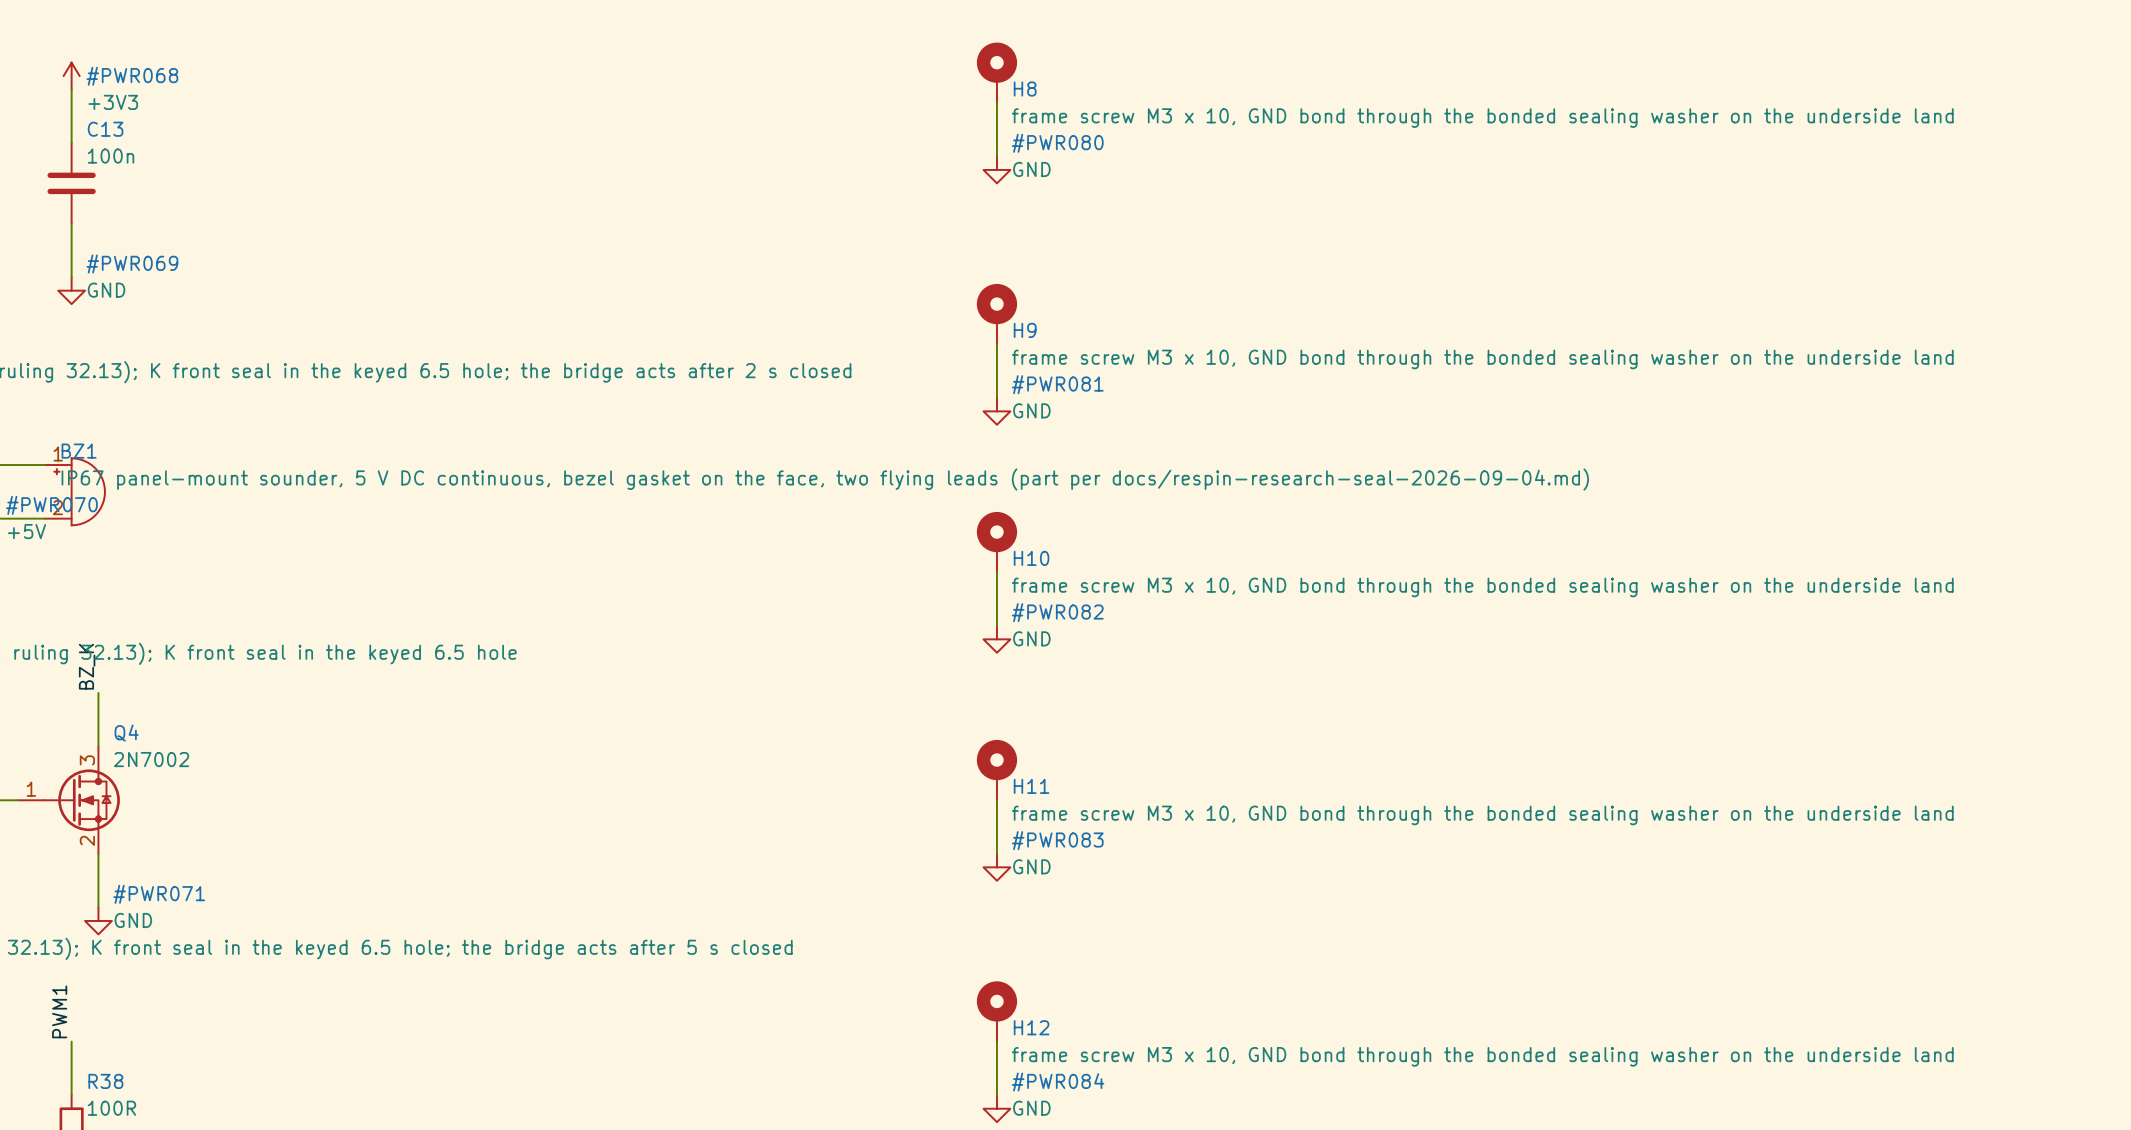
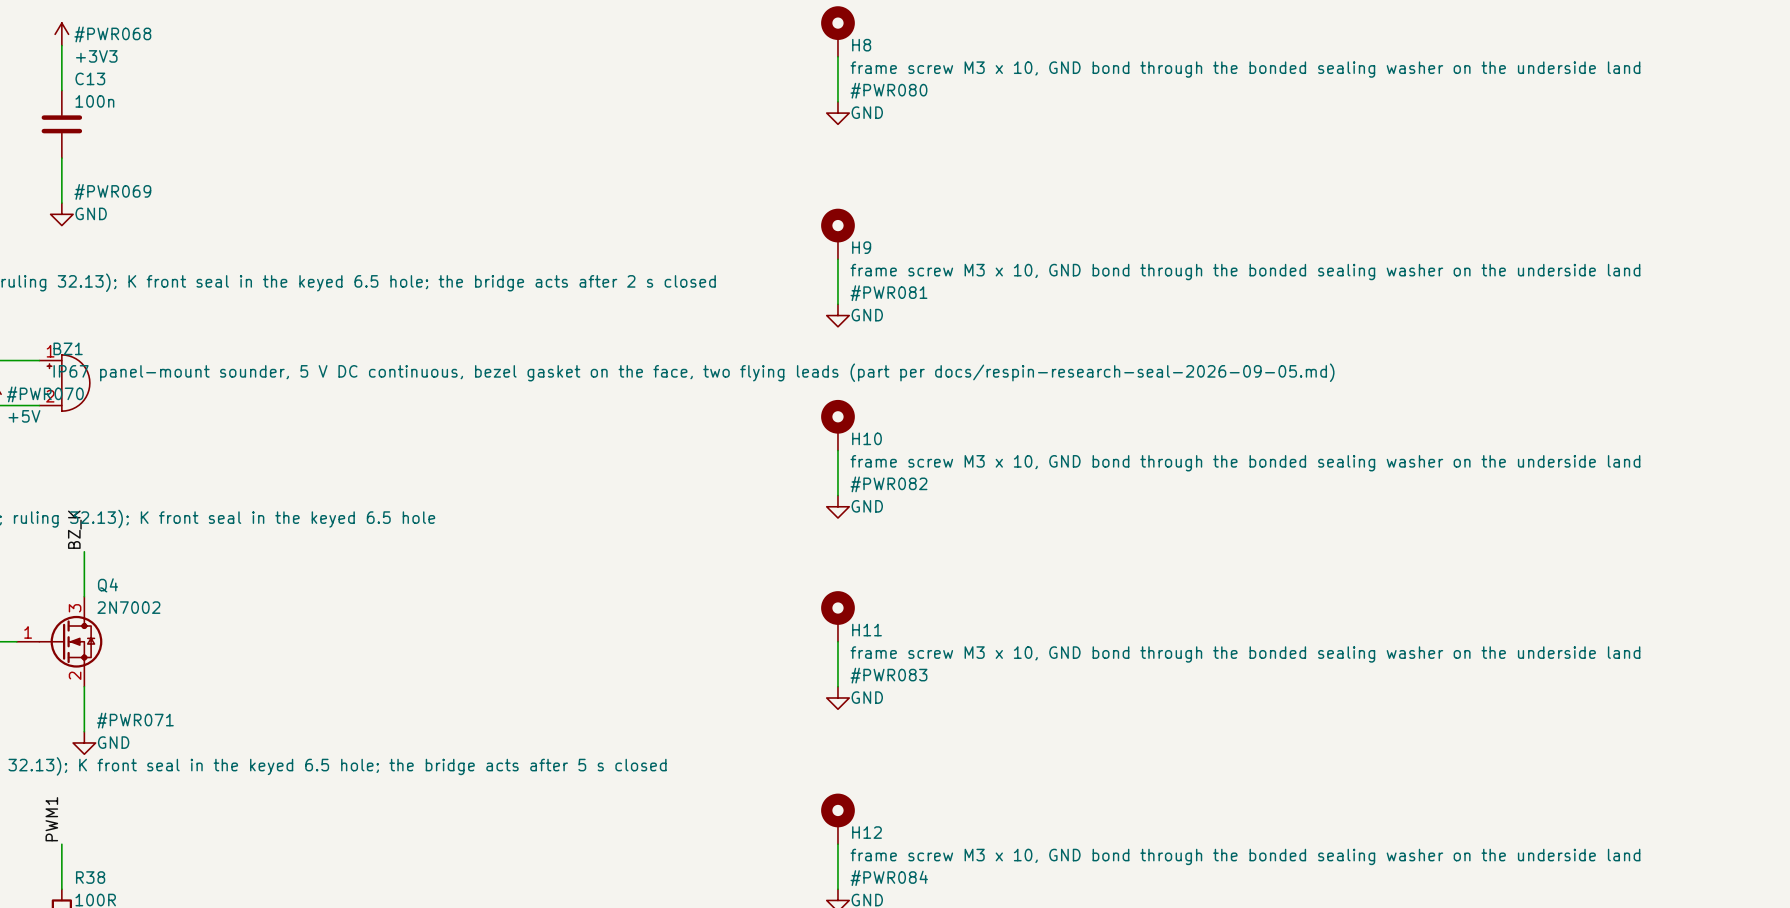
BZ1 value: IP67 panel-mount sounder, 5 V DC continuous, bezel gasket on the face, two flying leads (part per docs/respin-research-seal-2026-09-04.md) (825, 479) -> IP67 panel-mount sounder, 5 V DC continuous, bezel gasket on the face, two flying leads (part per docs/respin-research-seal-2026-09-05.md) (693, 372)

